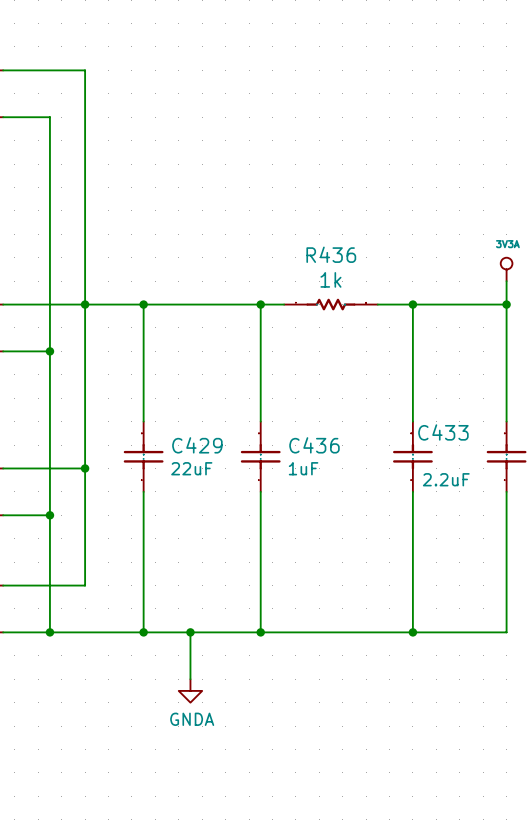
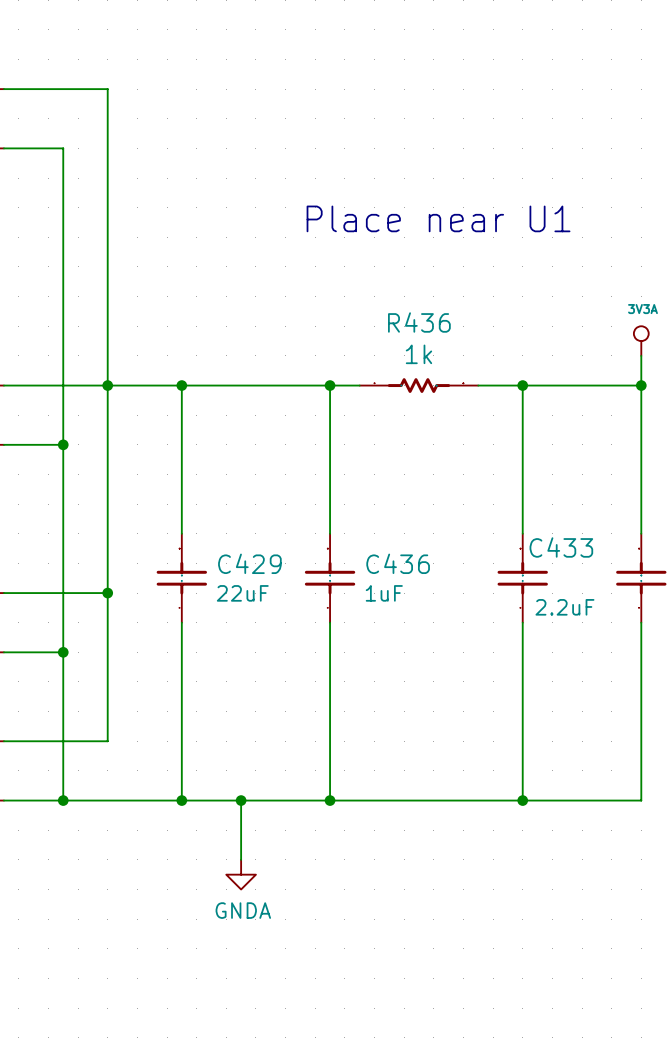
text: none -> Place near U1 (438, 218)

